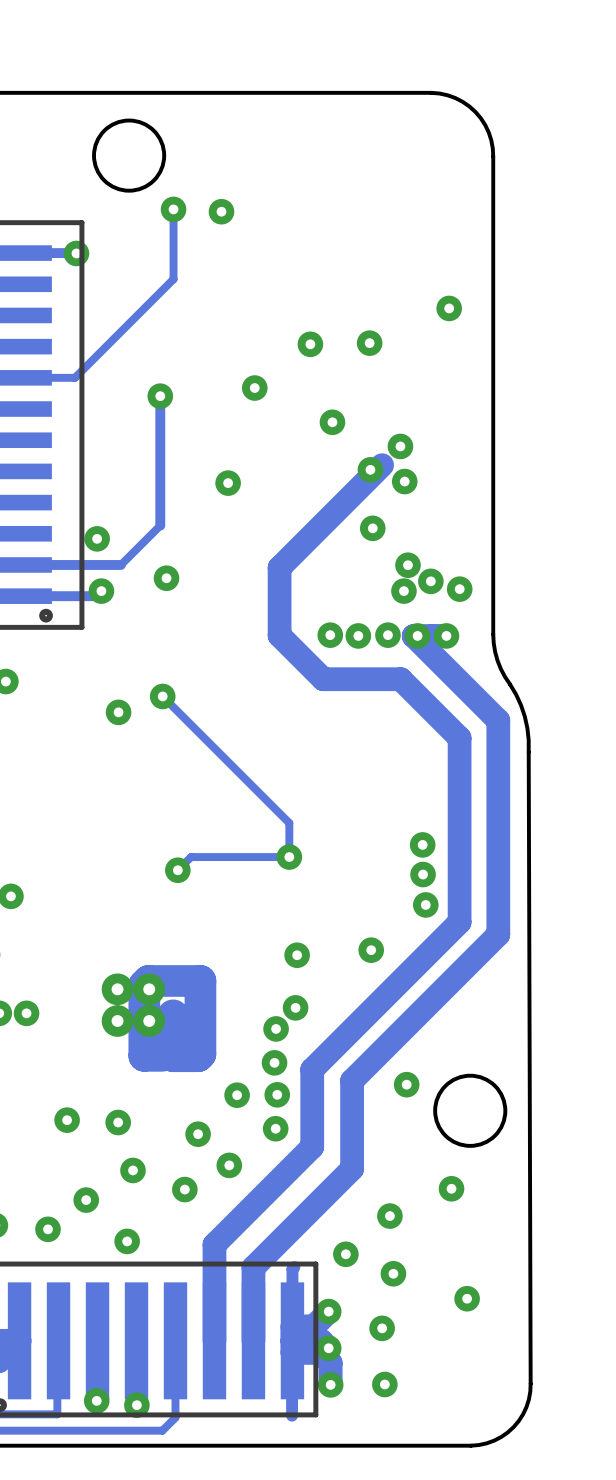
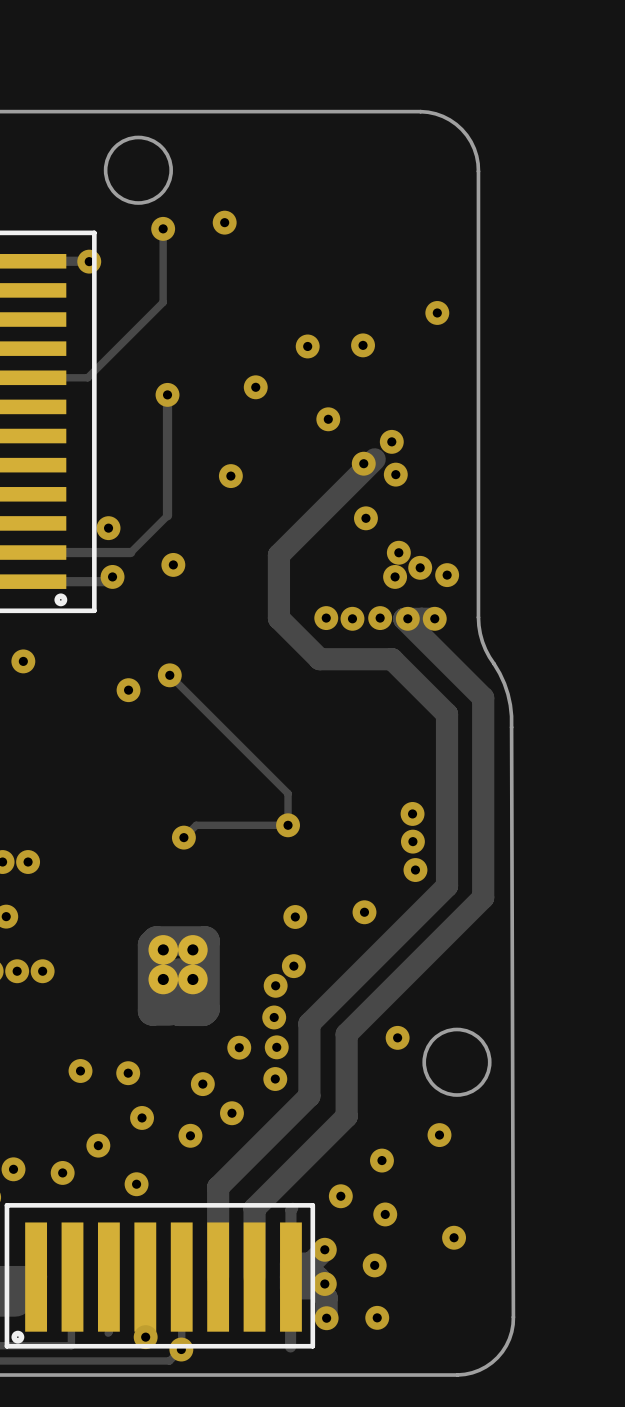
track: (173, 209) (173, 279) (155, 297) -> (163, 228) (163, 302)
via position: (173, 209) -> (163, 228)
part position: (133, 1005) -> (178, 964)
via position: (96, 1400) -> (181, 1349)

